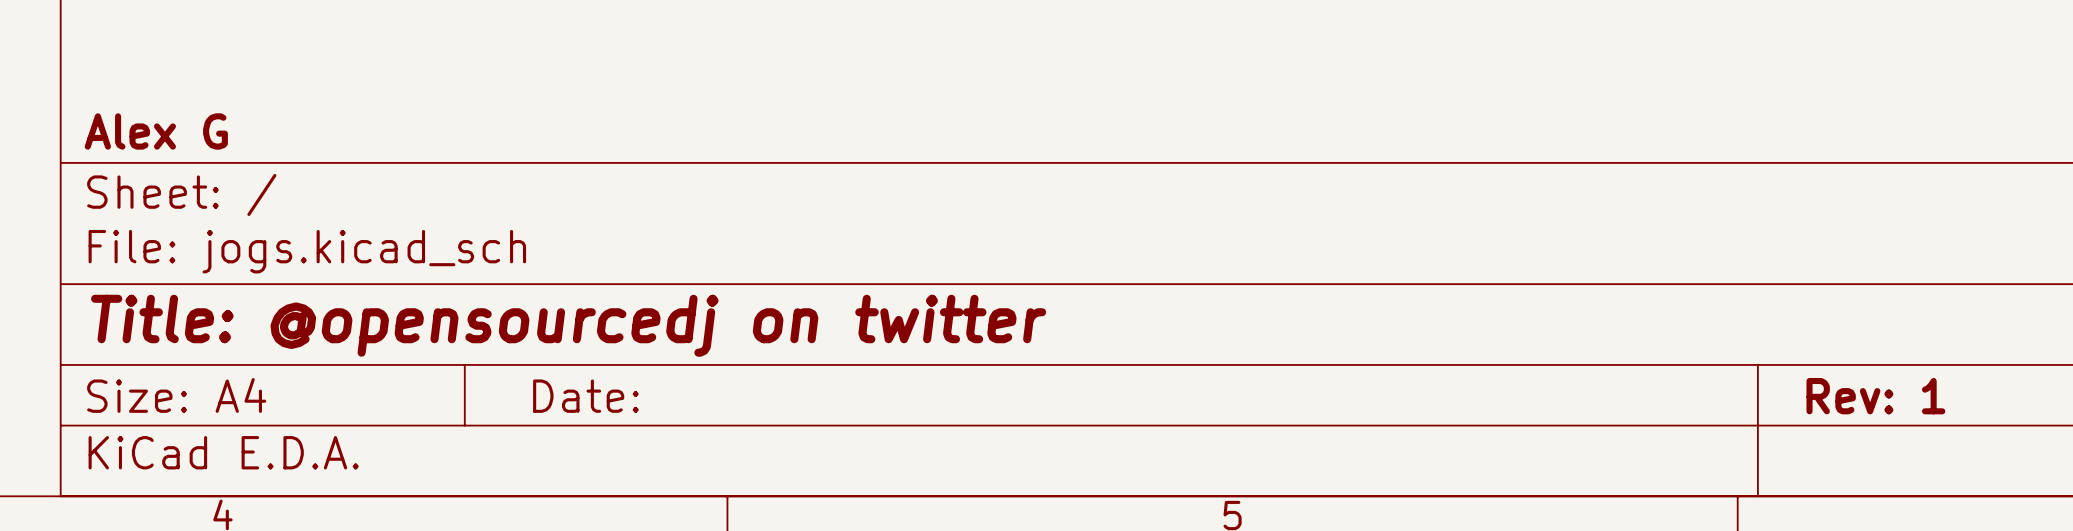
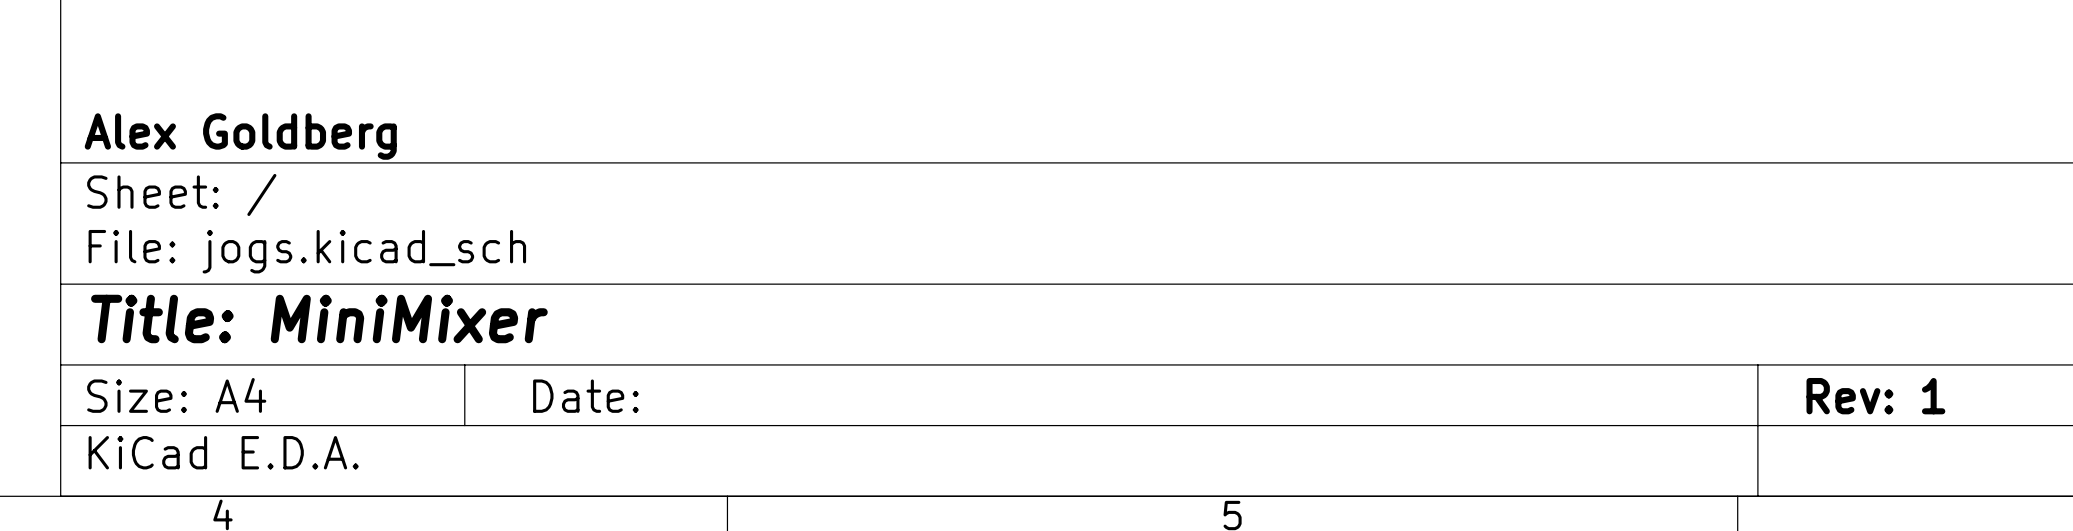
title block: Alex G (156, 131) -> Alex Goldberg (240, 136)
title block: Title: @opensourcedj on twitter (568, 325) -> Title: MiniMixer (319, 319)

